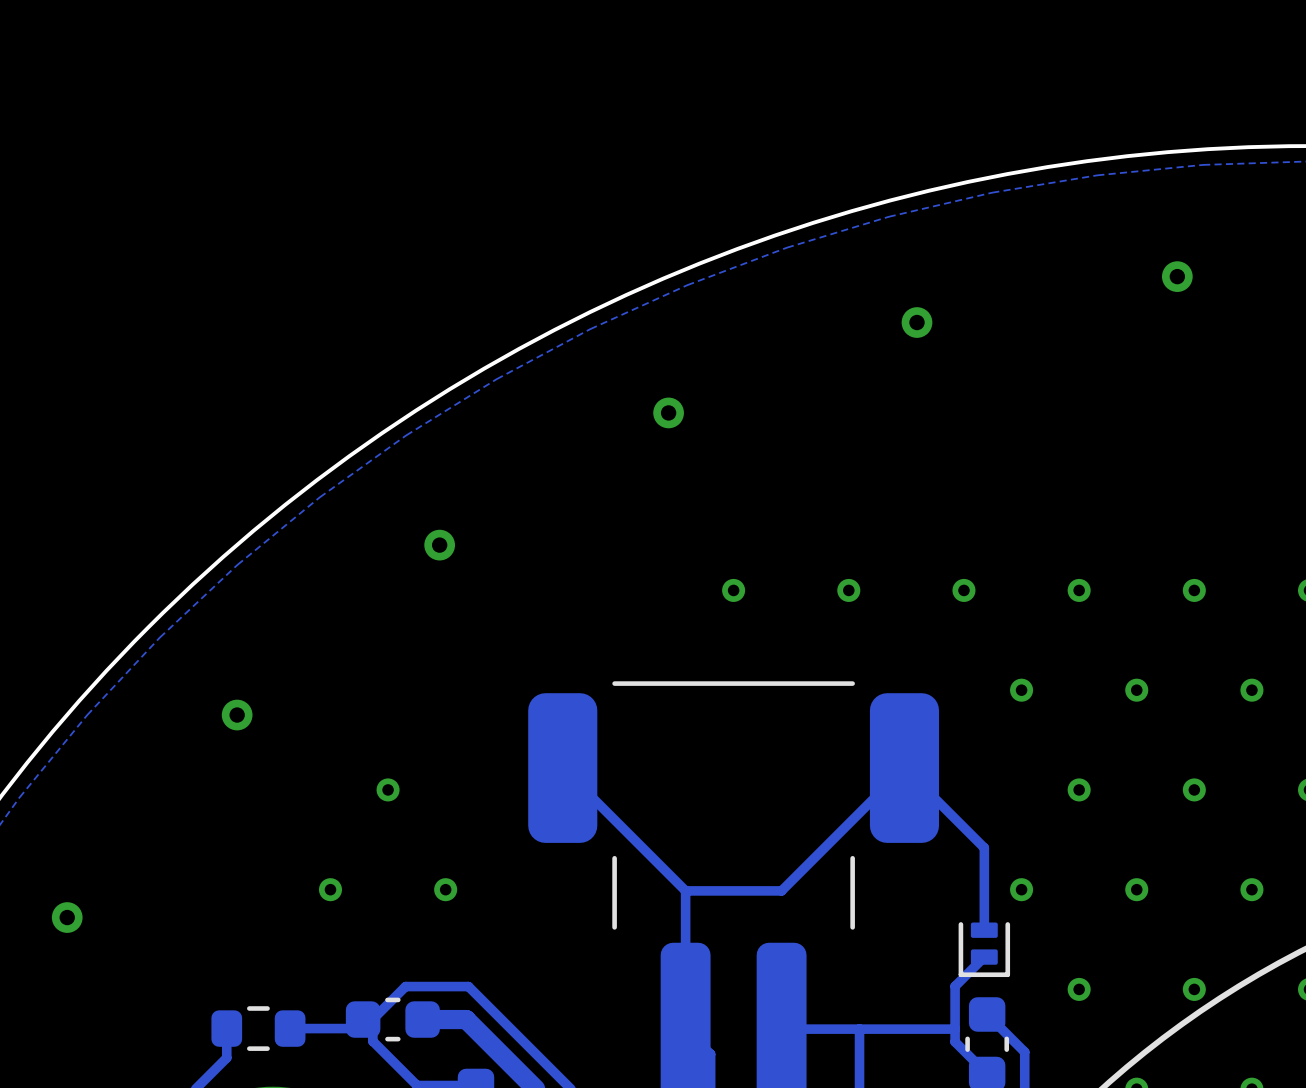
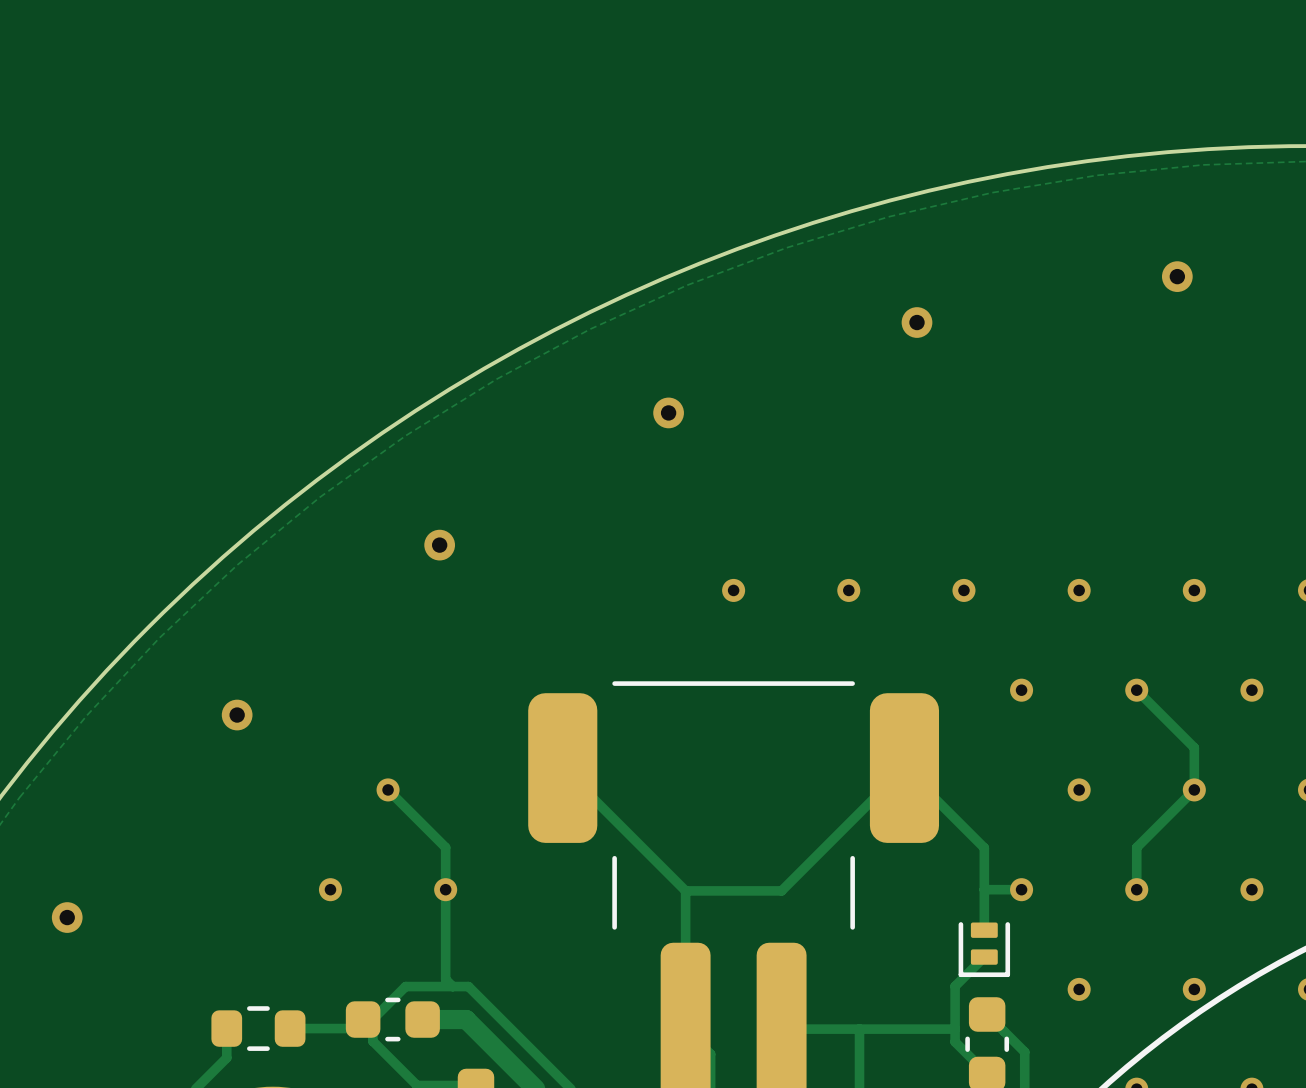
track: none -> (1136, 690) (1194, 747) (1194, 789) (1136, 847) (1136, 889)
track: none -> (388, 789) (445, 847) (445, 979) (452, 986)
track: none -> (1021, 889) (984, 889)

